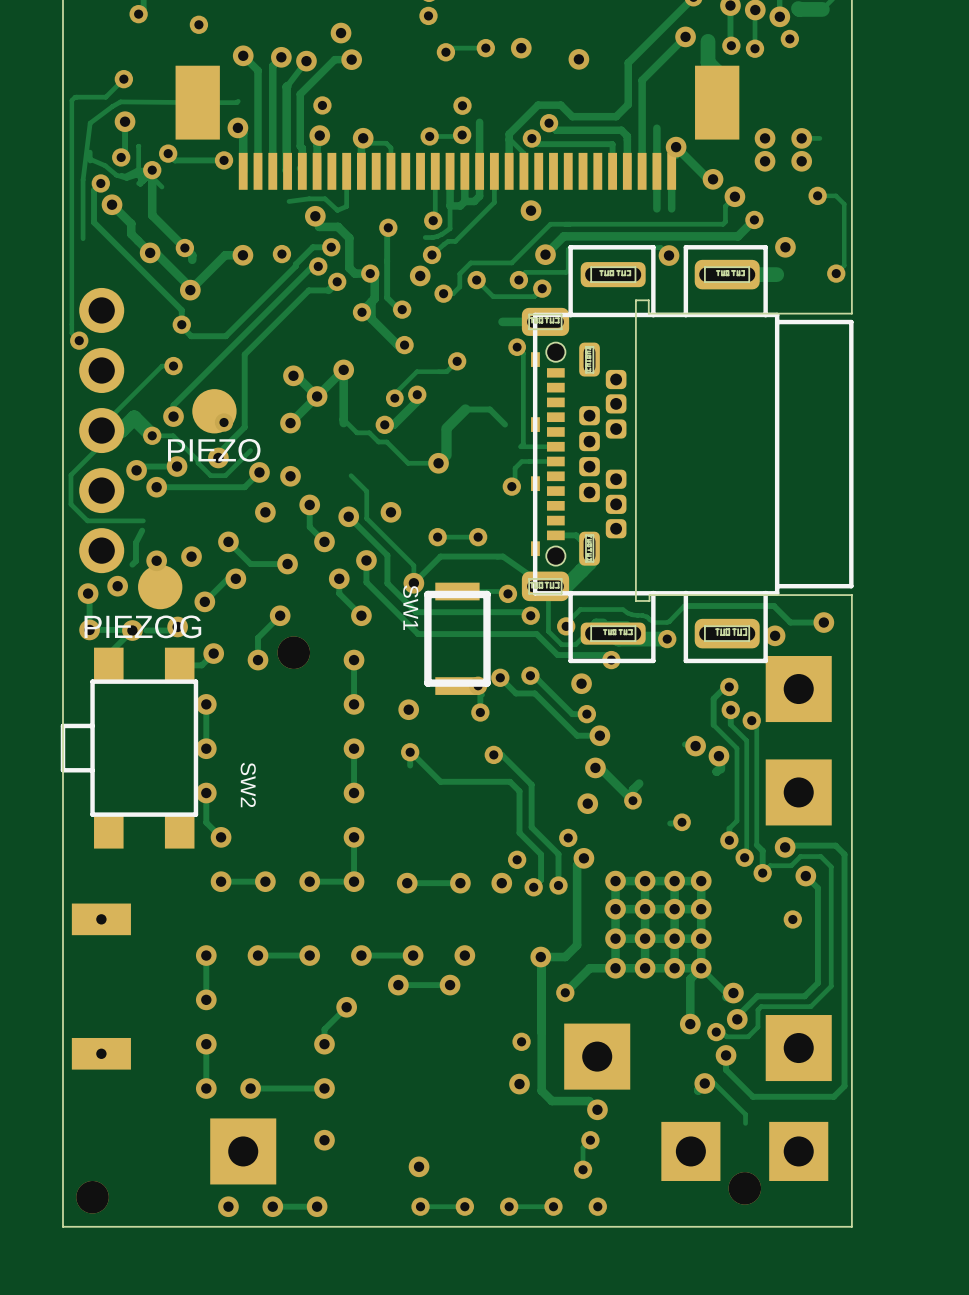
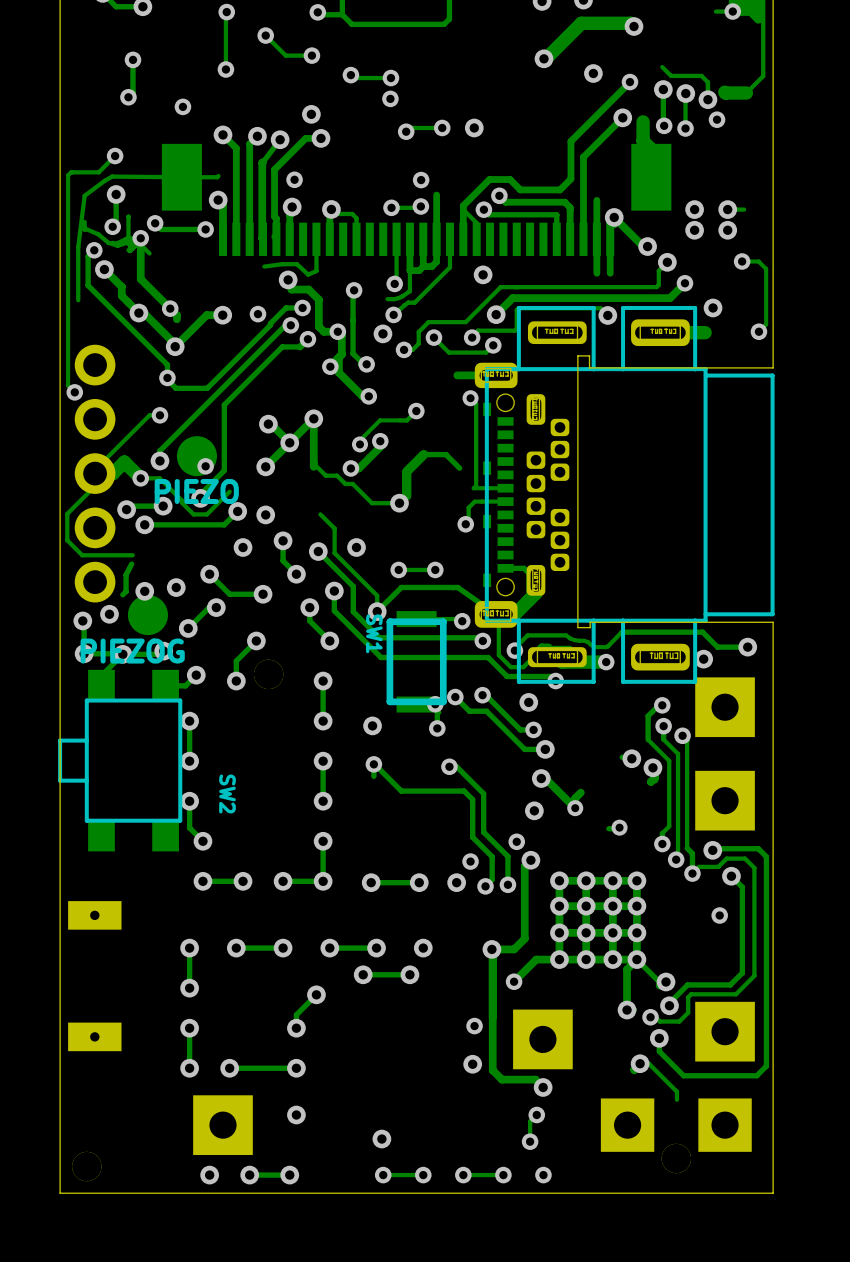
via: (578, 59) -> none

